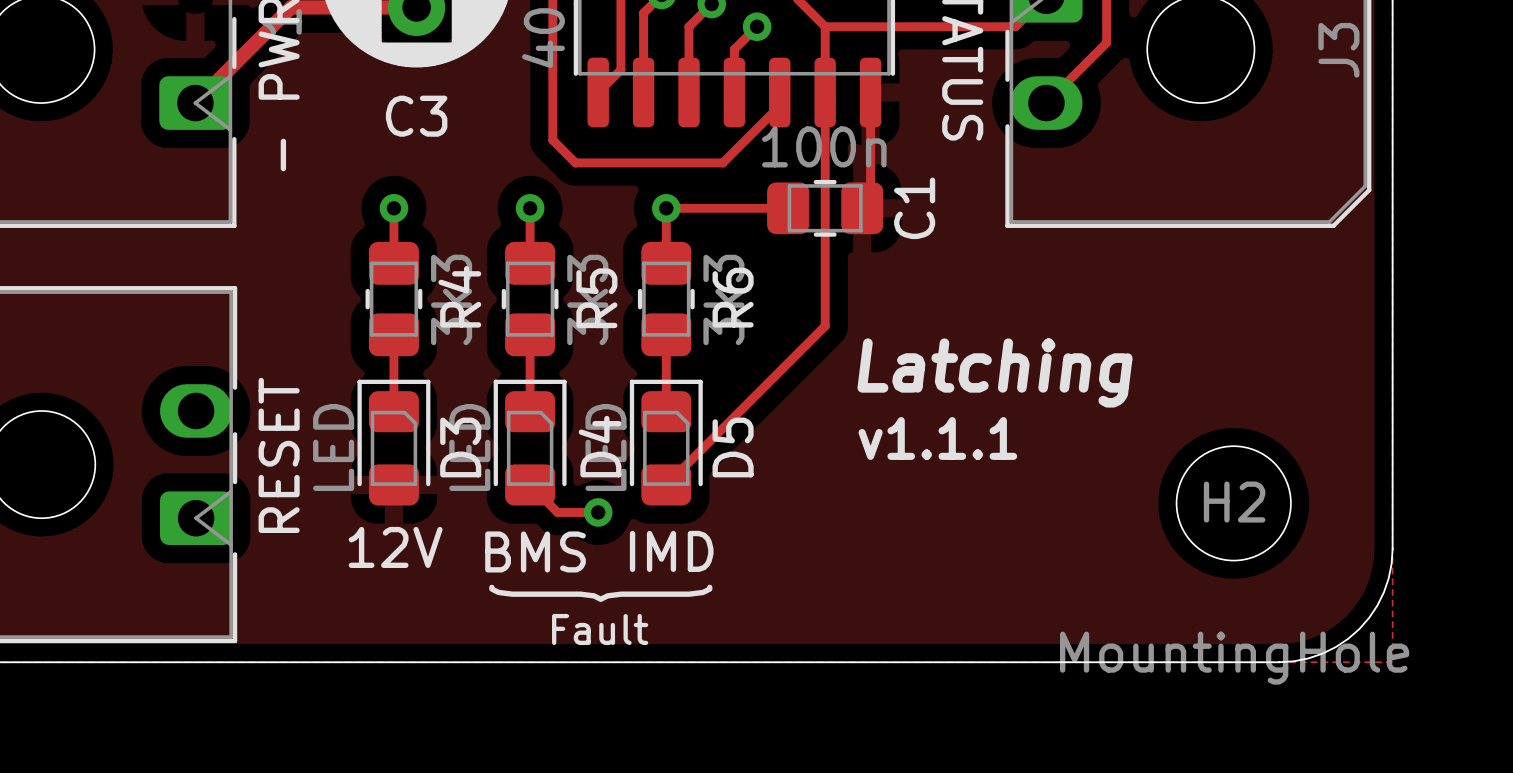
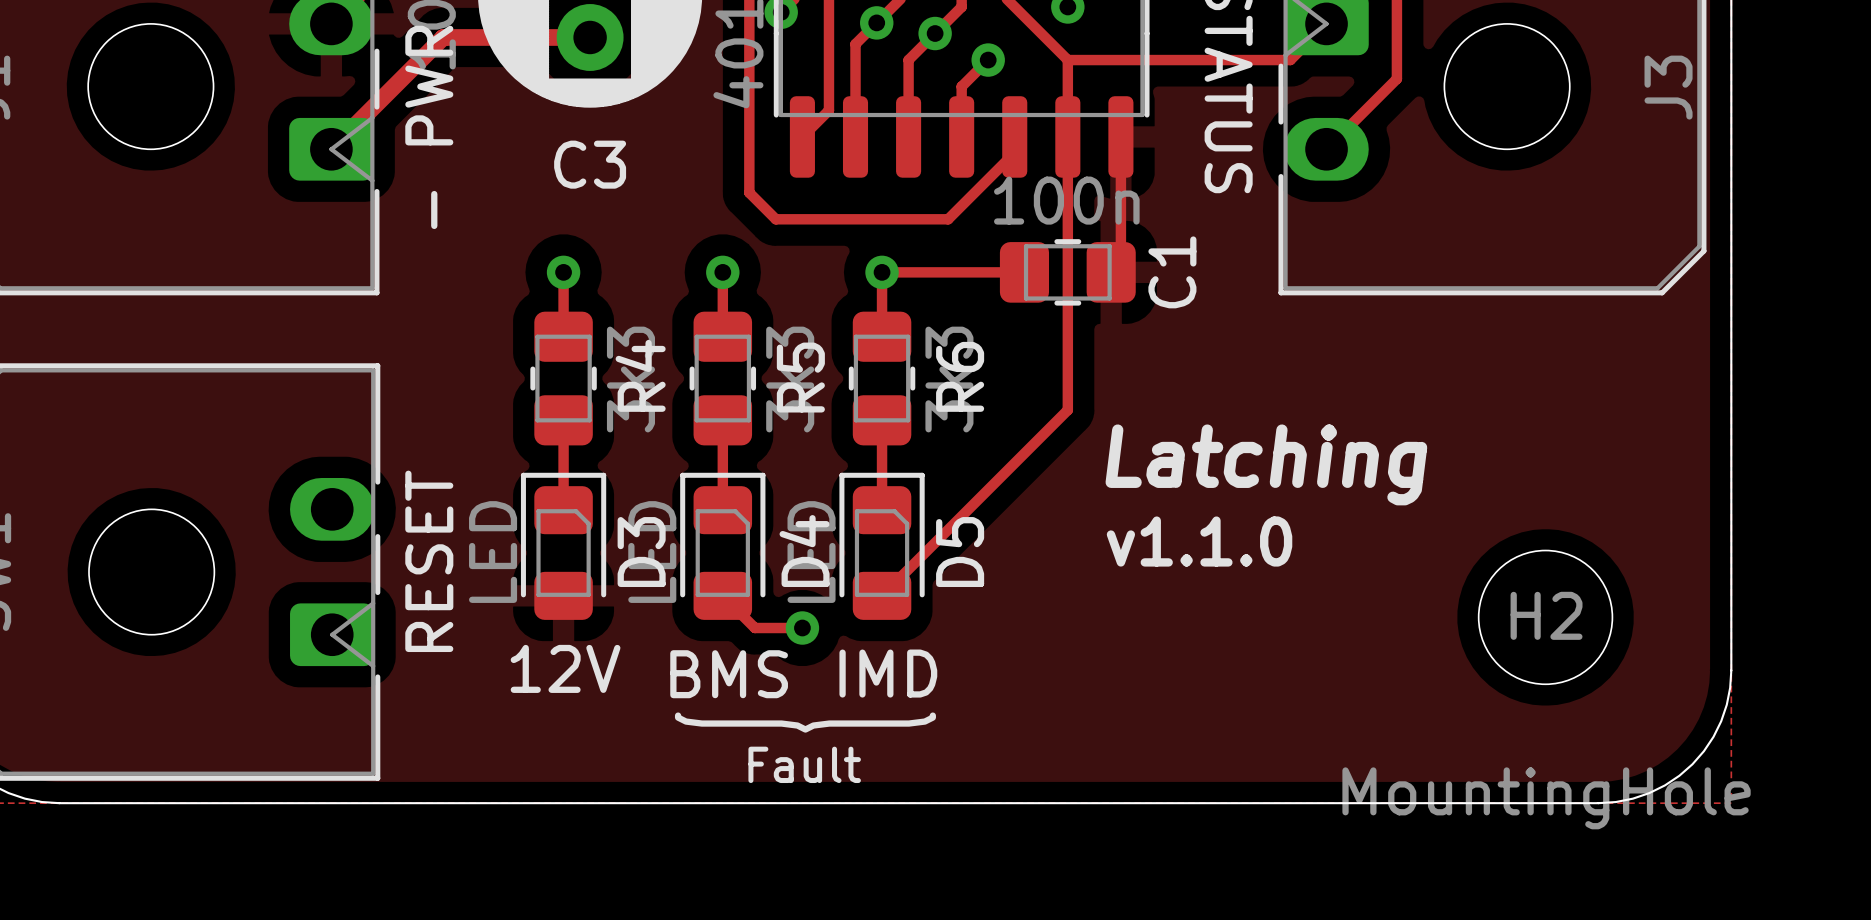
text: v1.1.1 (937, 438) -> v1.1.0 (1199, 541)

